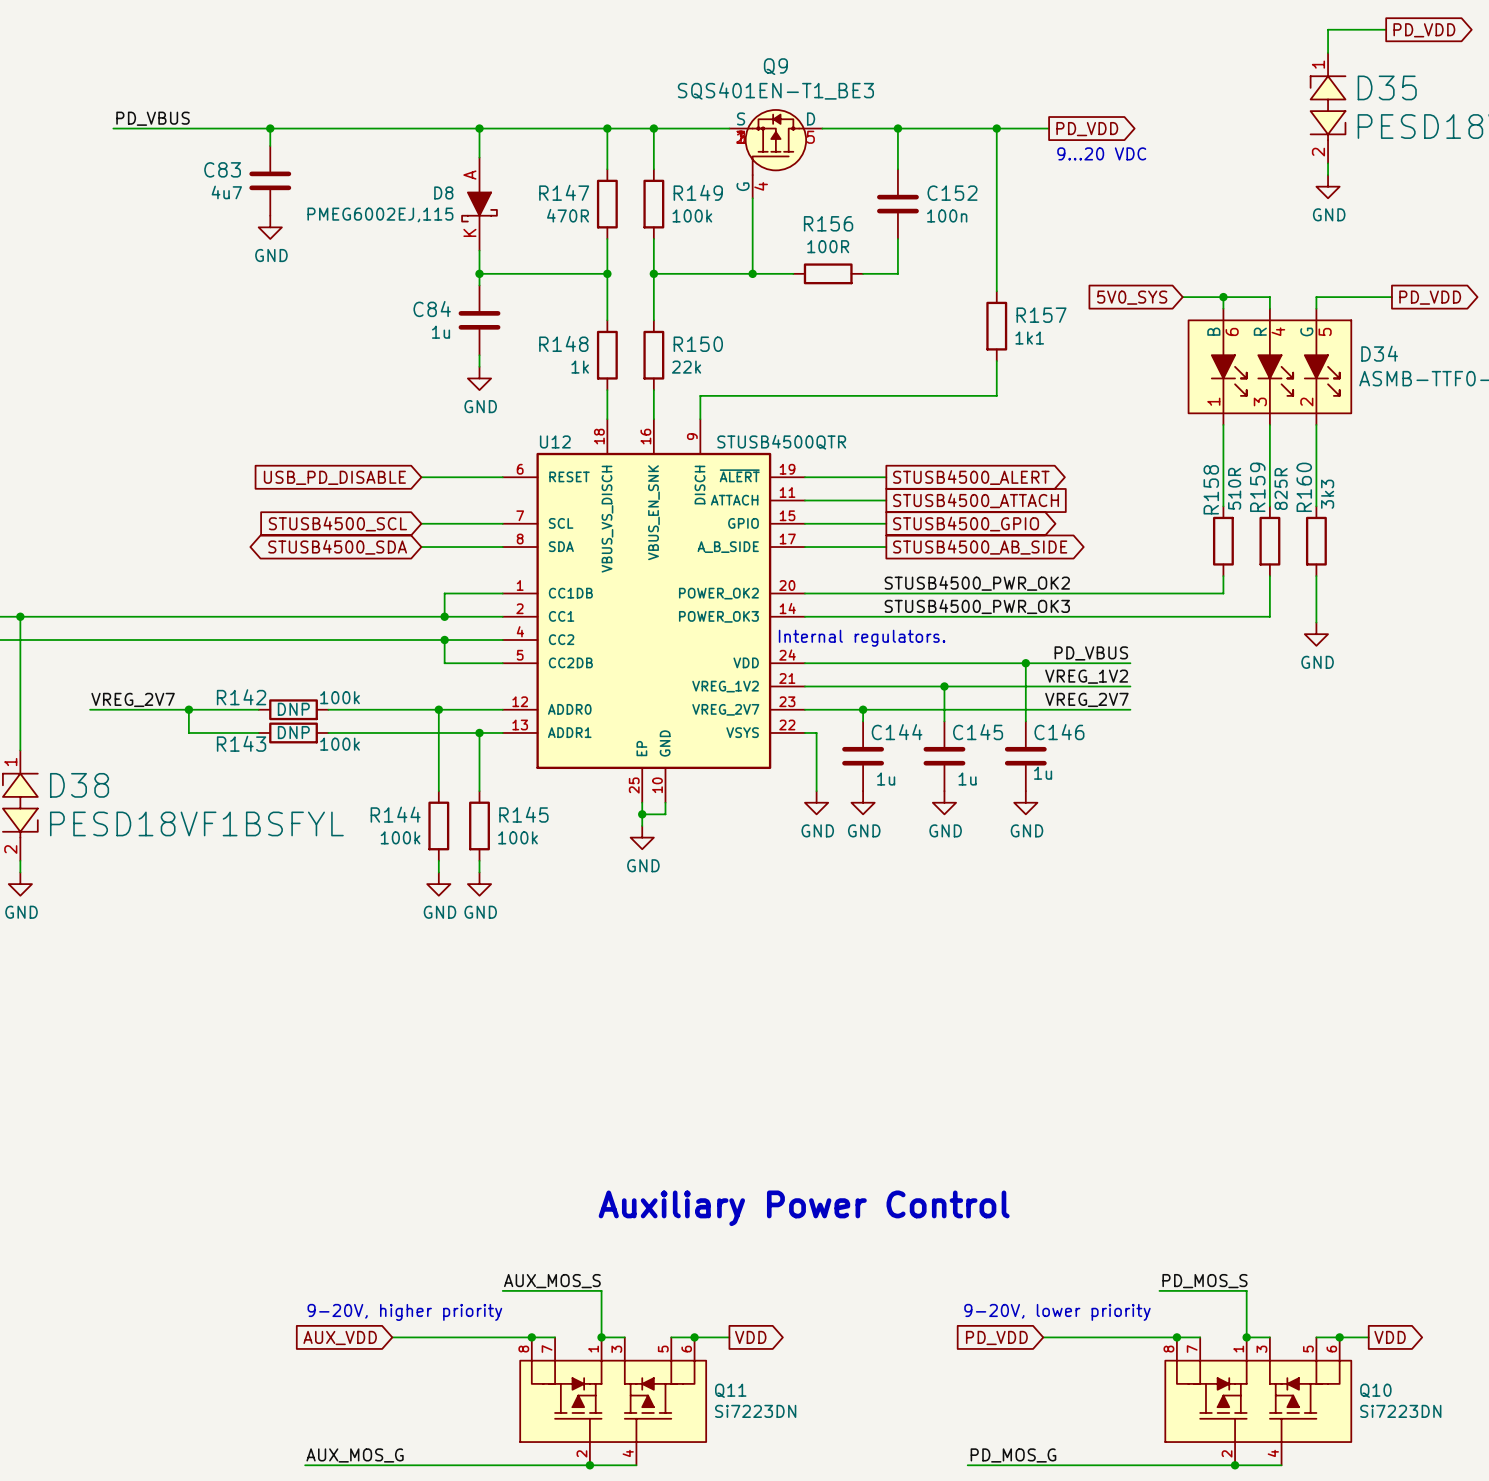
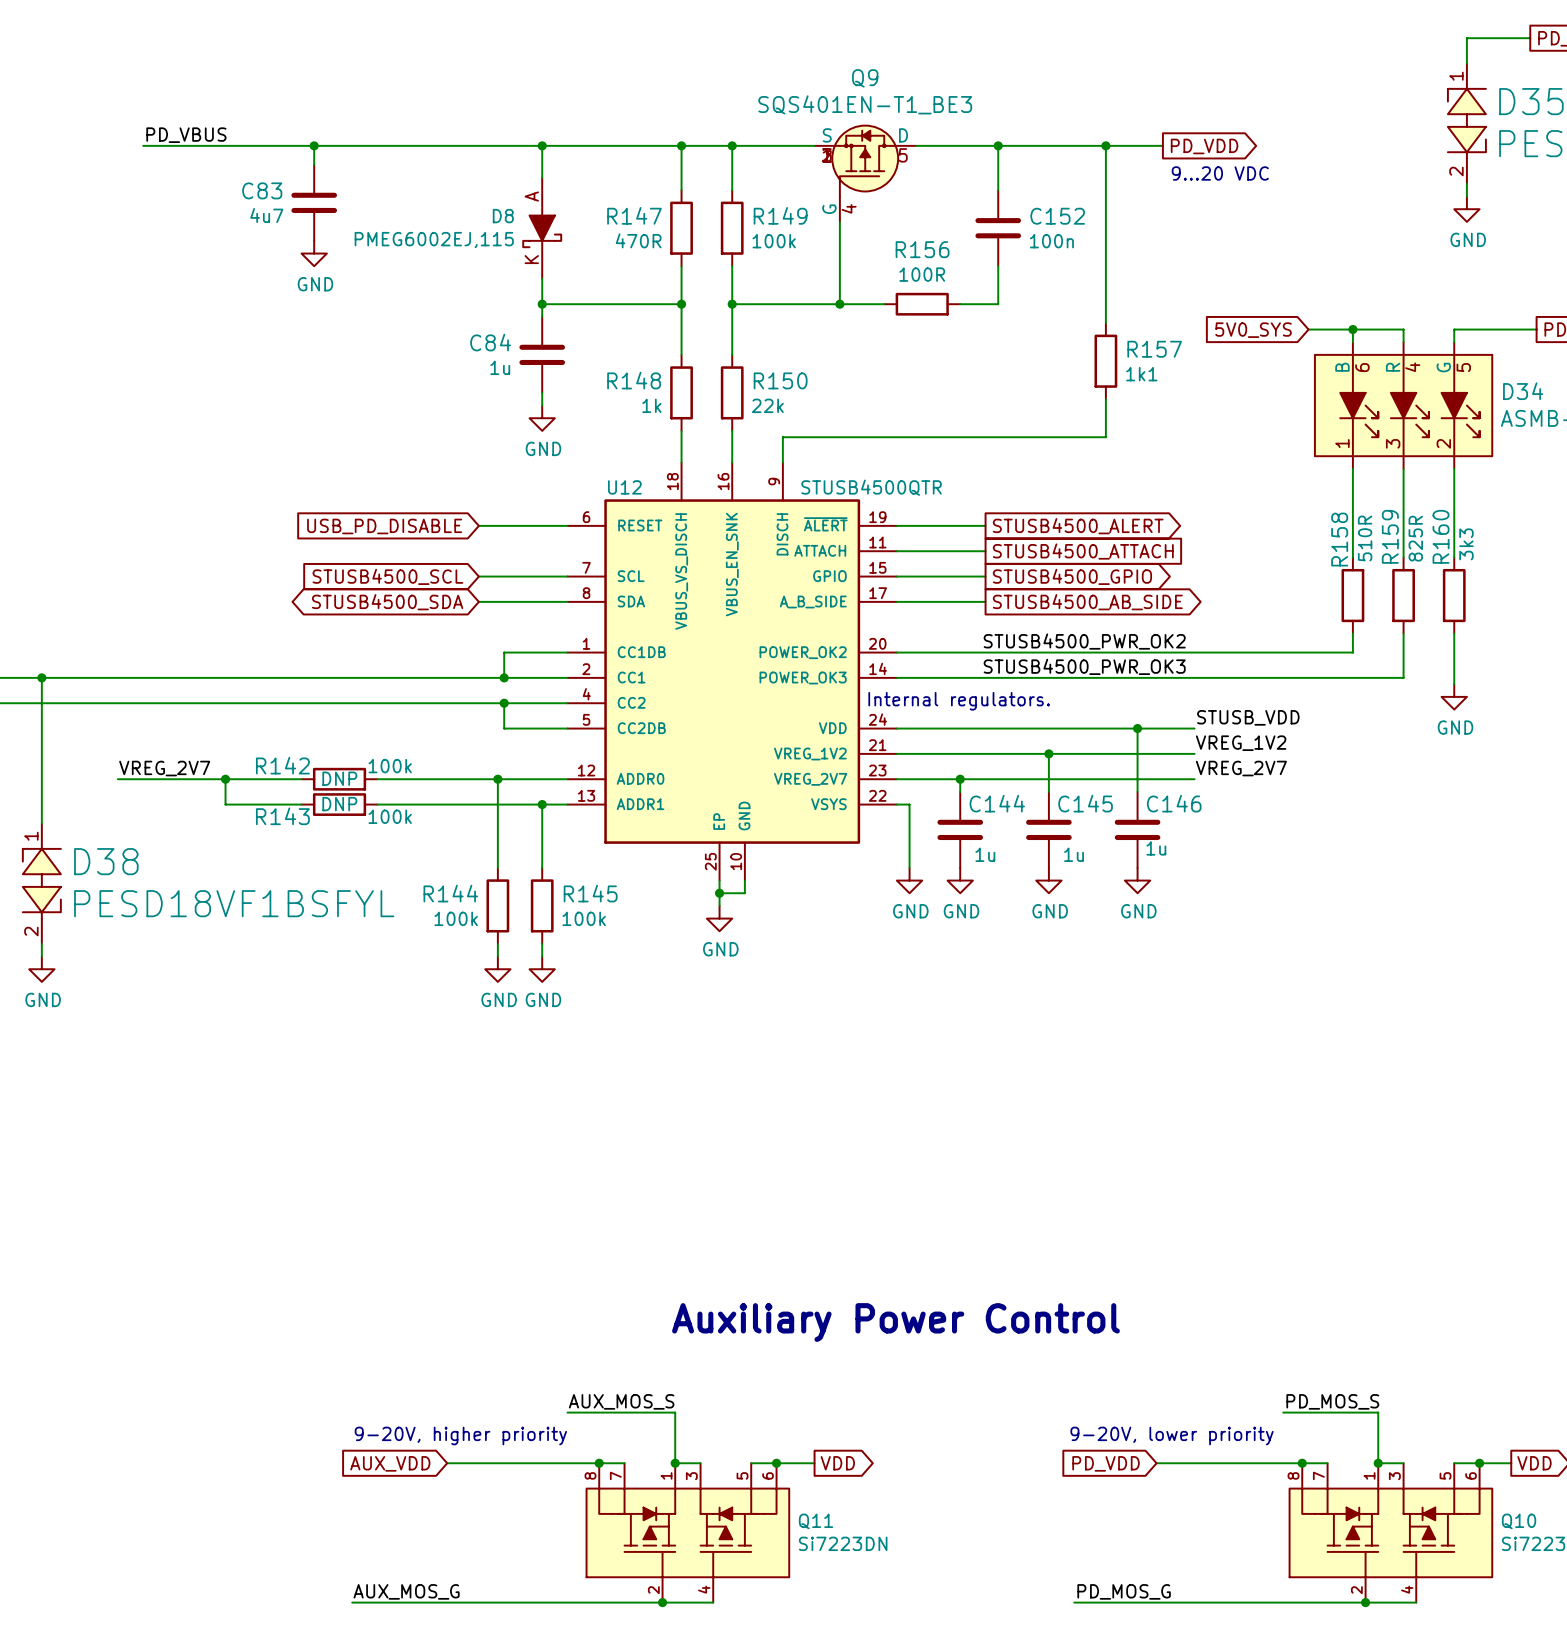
label: PD_VBUS (1091, 653) -> none
label: none -> STUSB_VDD (1248, 717)
wire: (1078, 663) (1130, 663) -> none
label position: VREG_1V2 (1086, 676) -> VREG_1V2 (1241, 743)
wire: (1078, 686) (1130, 686) -> none
label position: VREG_2V7 (1086, 699) -> VREG_2V7 (1241, 768)
wire: (1078, 709) (1130, 709) -> none

